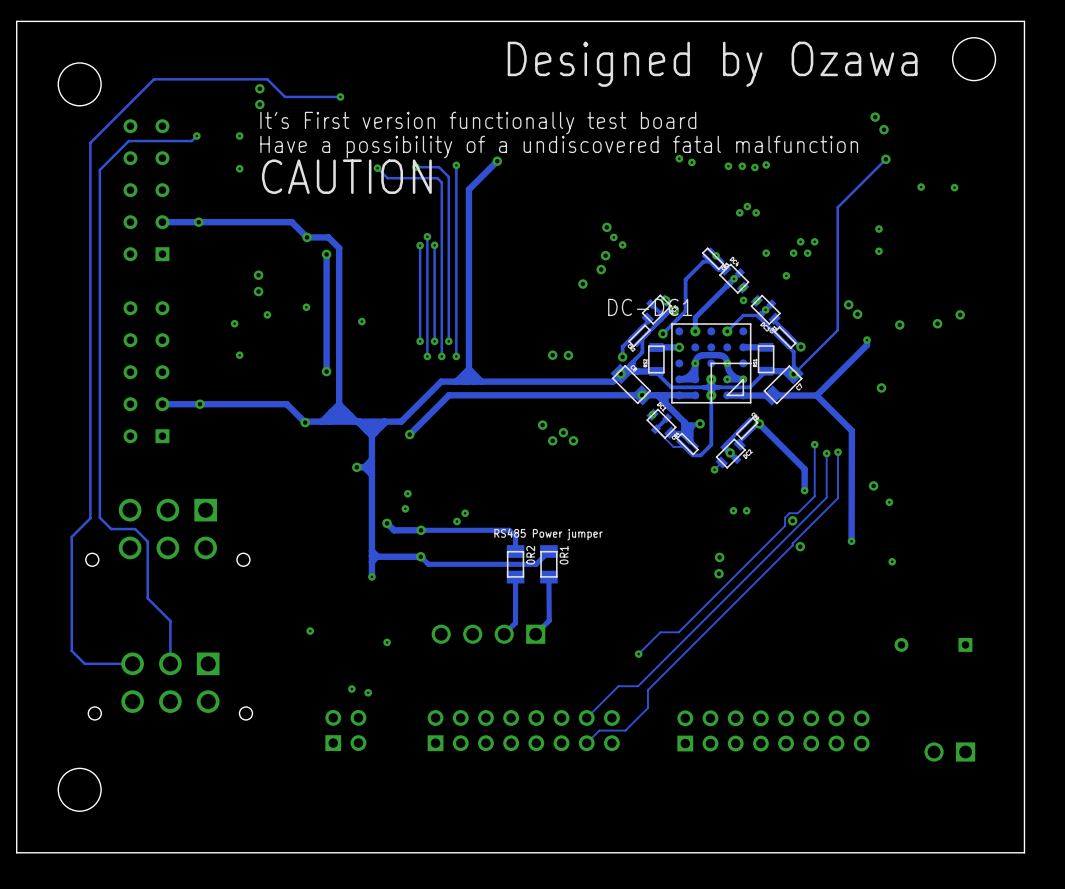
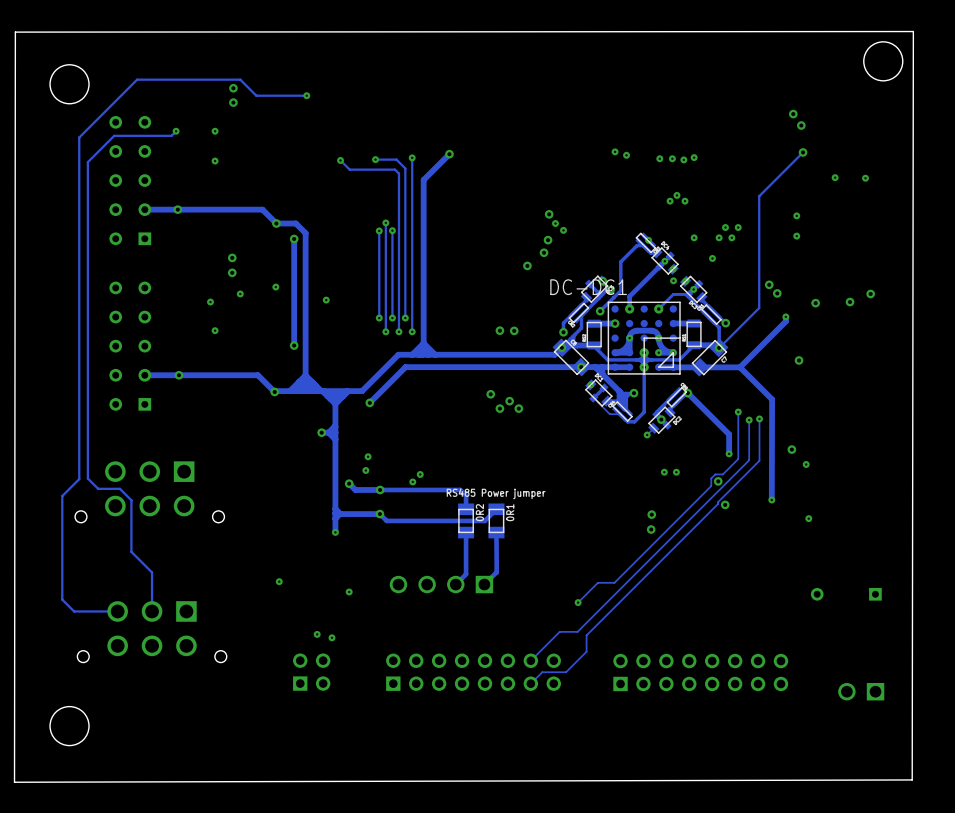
board edge: (1024, 21) (16, 21) (16, 852) (1024, 852) (1024, 21) -> (913, 31) (912, 779) (14, 782) (15, 32) (913, 31)
text: Designed by Ozawa (712, 64) -> none
text: It's First version functionally test board (478, 123) -> none
text: Have a possibility of a undiscovered fatal malfunction (559, 147) -> none
text: CAUTION (346, 176) -> none

